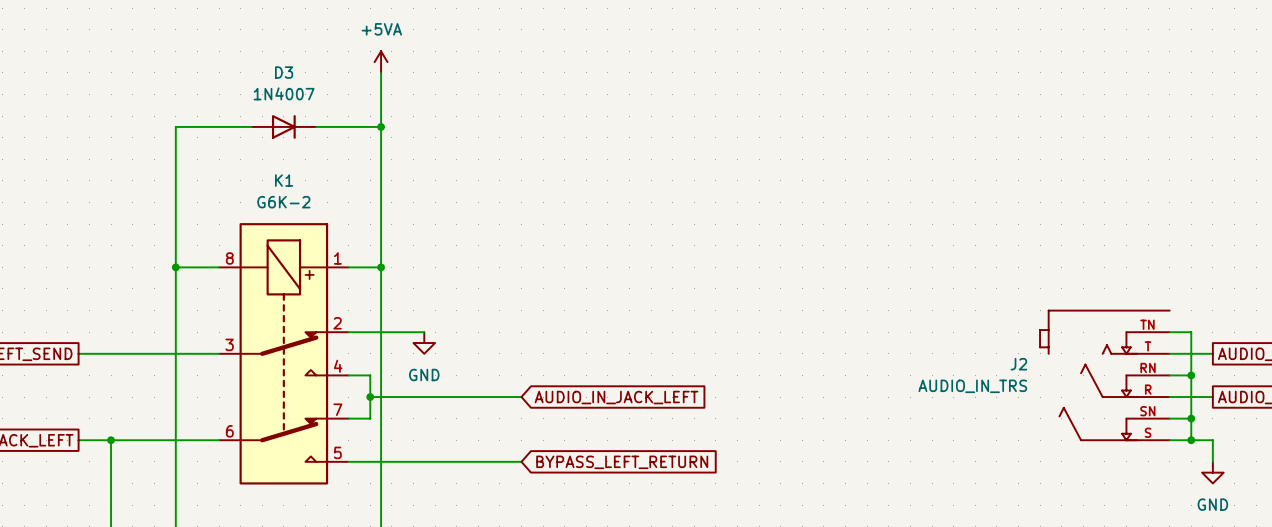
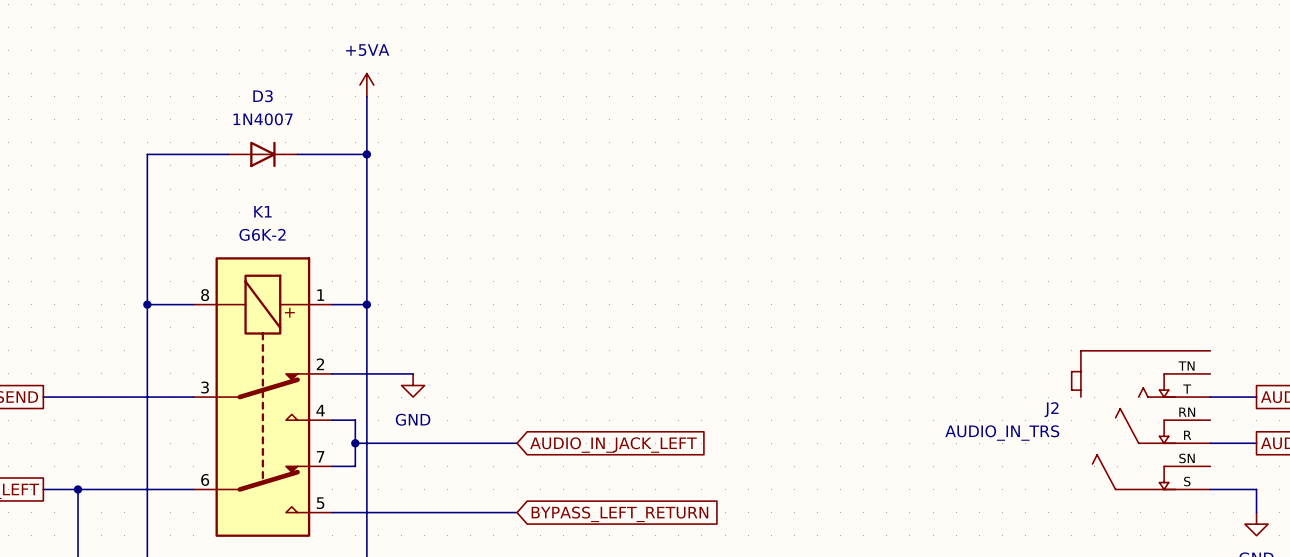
wire: (1169, 332) (1191, 332) (1191, 440) -> none
wire: (1169, 375) (1191, 375) -> none
junction: (1191, 375) -> none
wire: (1169, 418) (1191, 418) -> none
junction: (1191, 418) -> none
junction: (1191, 440) -> none

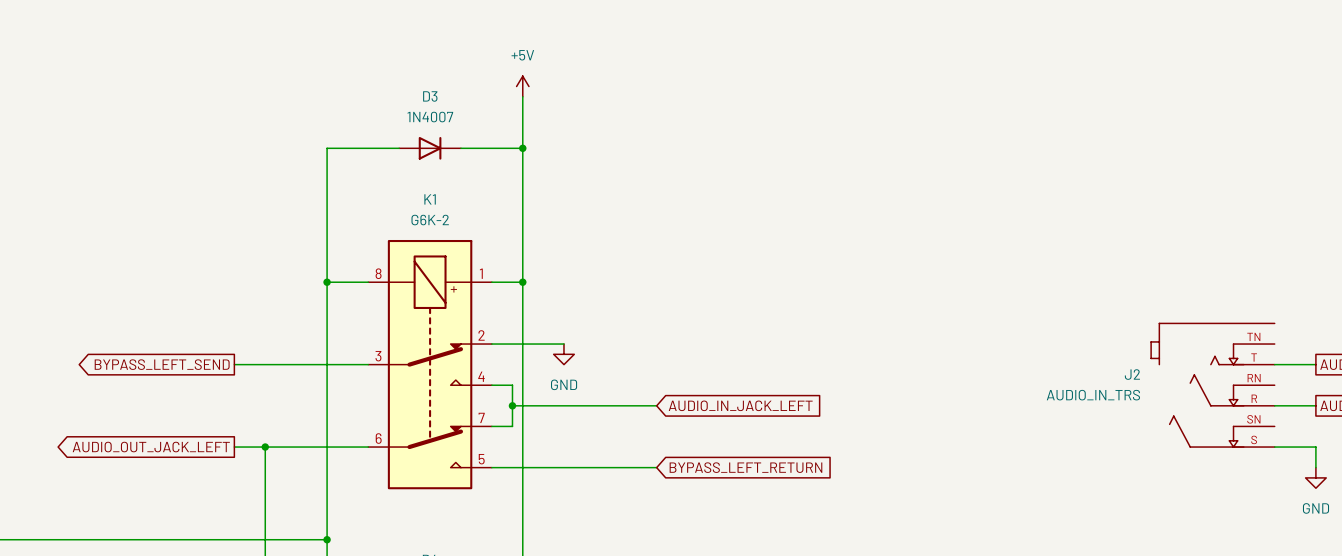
power symbol: +5VA (366, 85) -> +5V (522, 86)

